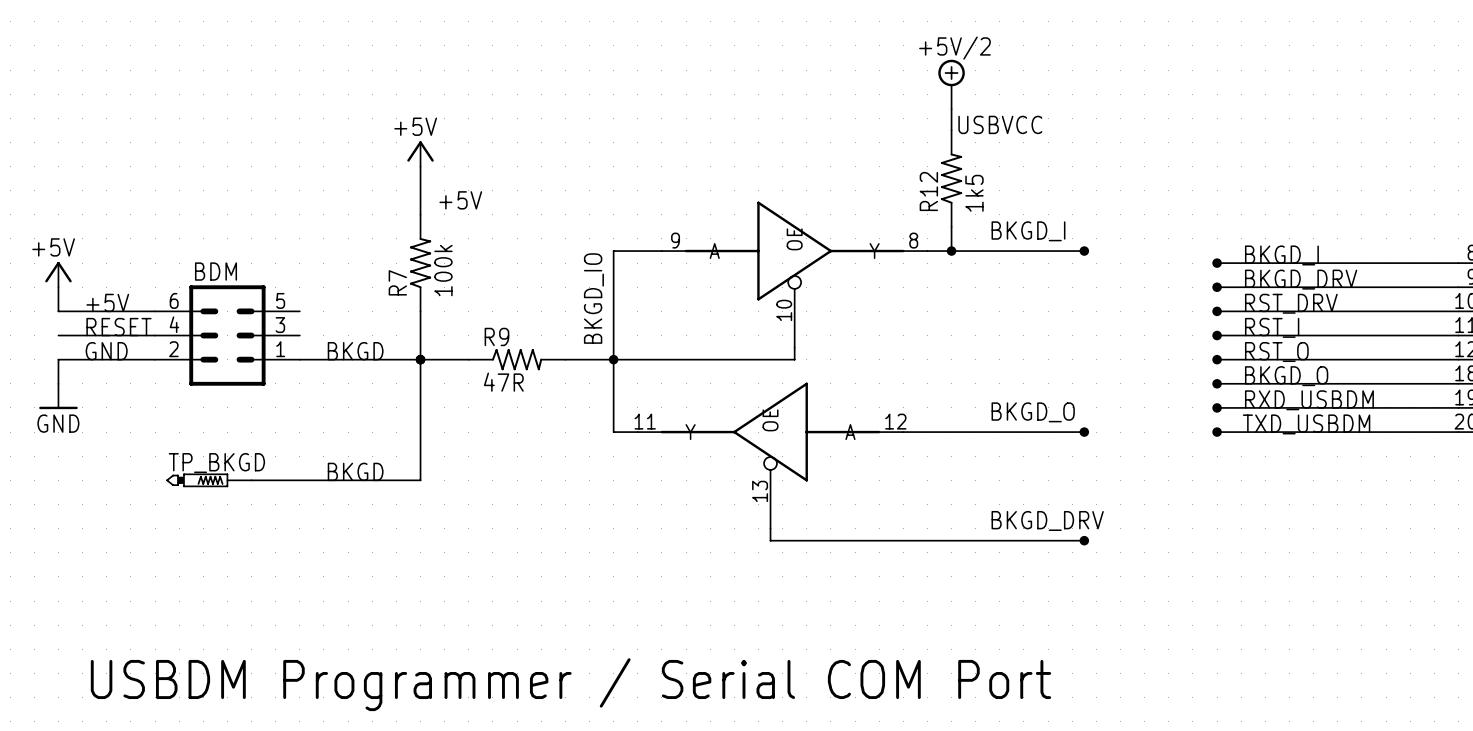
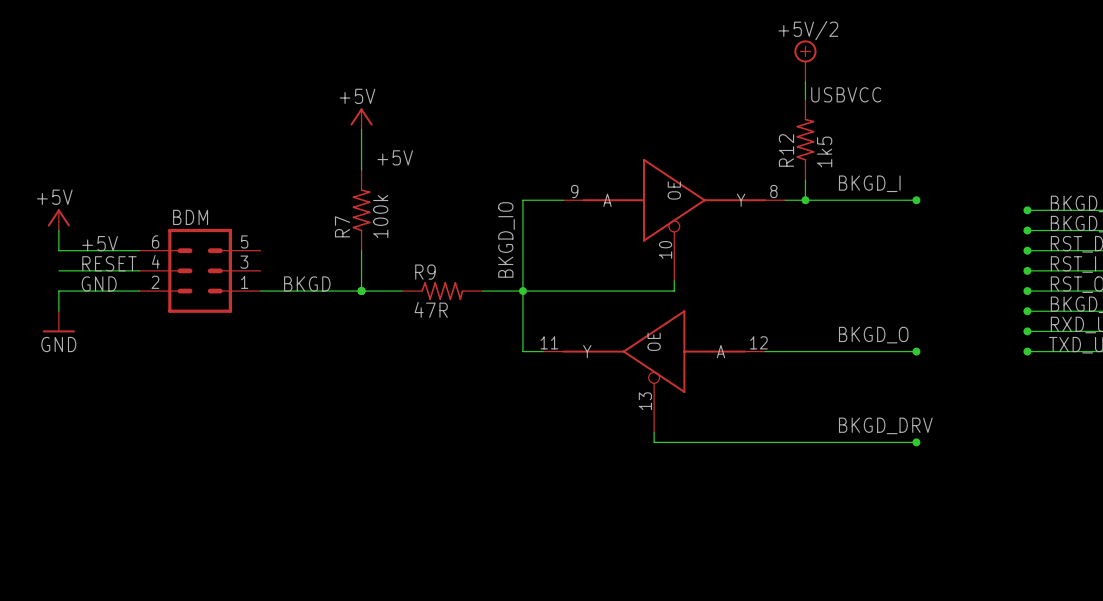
wire: (420, 359) (420, 480) (251, 480) -> none
label: BKGD (355, 471) -> none
TP_BKGD: (208, 480) -> none
text: USBDM Programmer / Serial COM Port (570, 684) -> none

